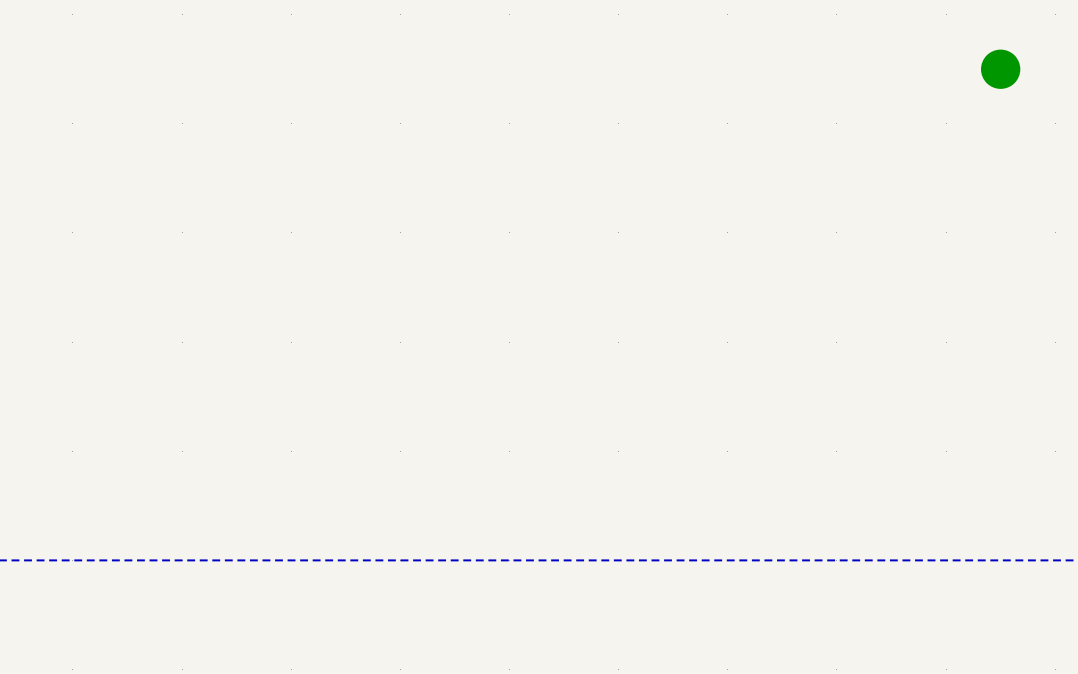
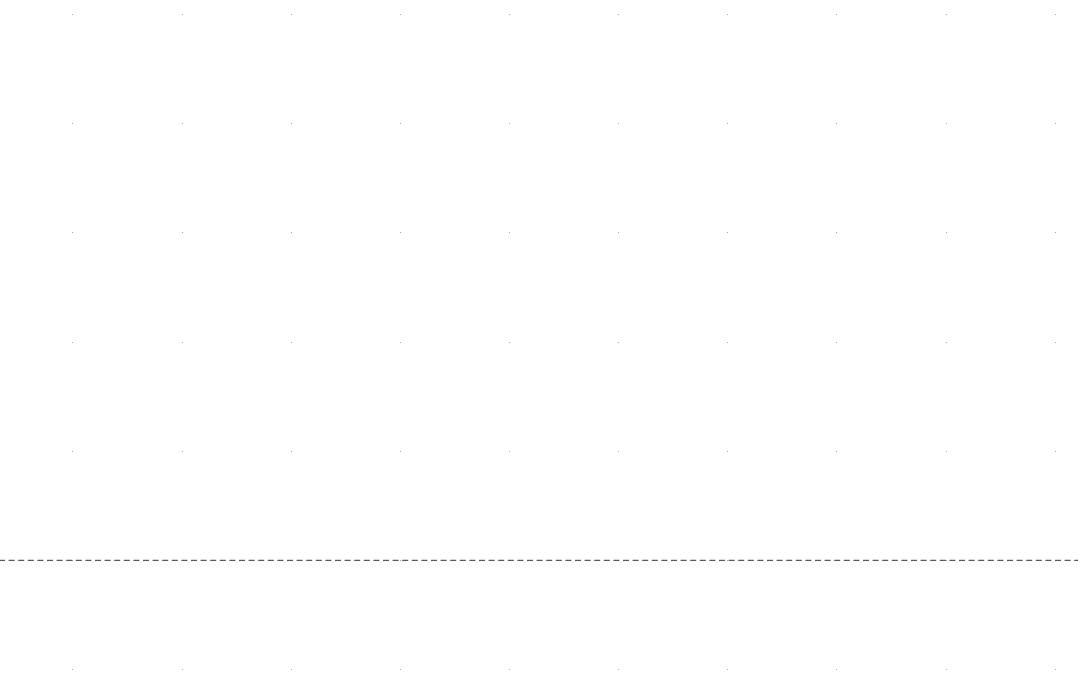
junction: (1000, 69) -> none

